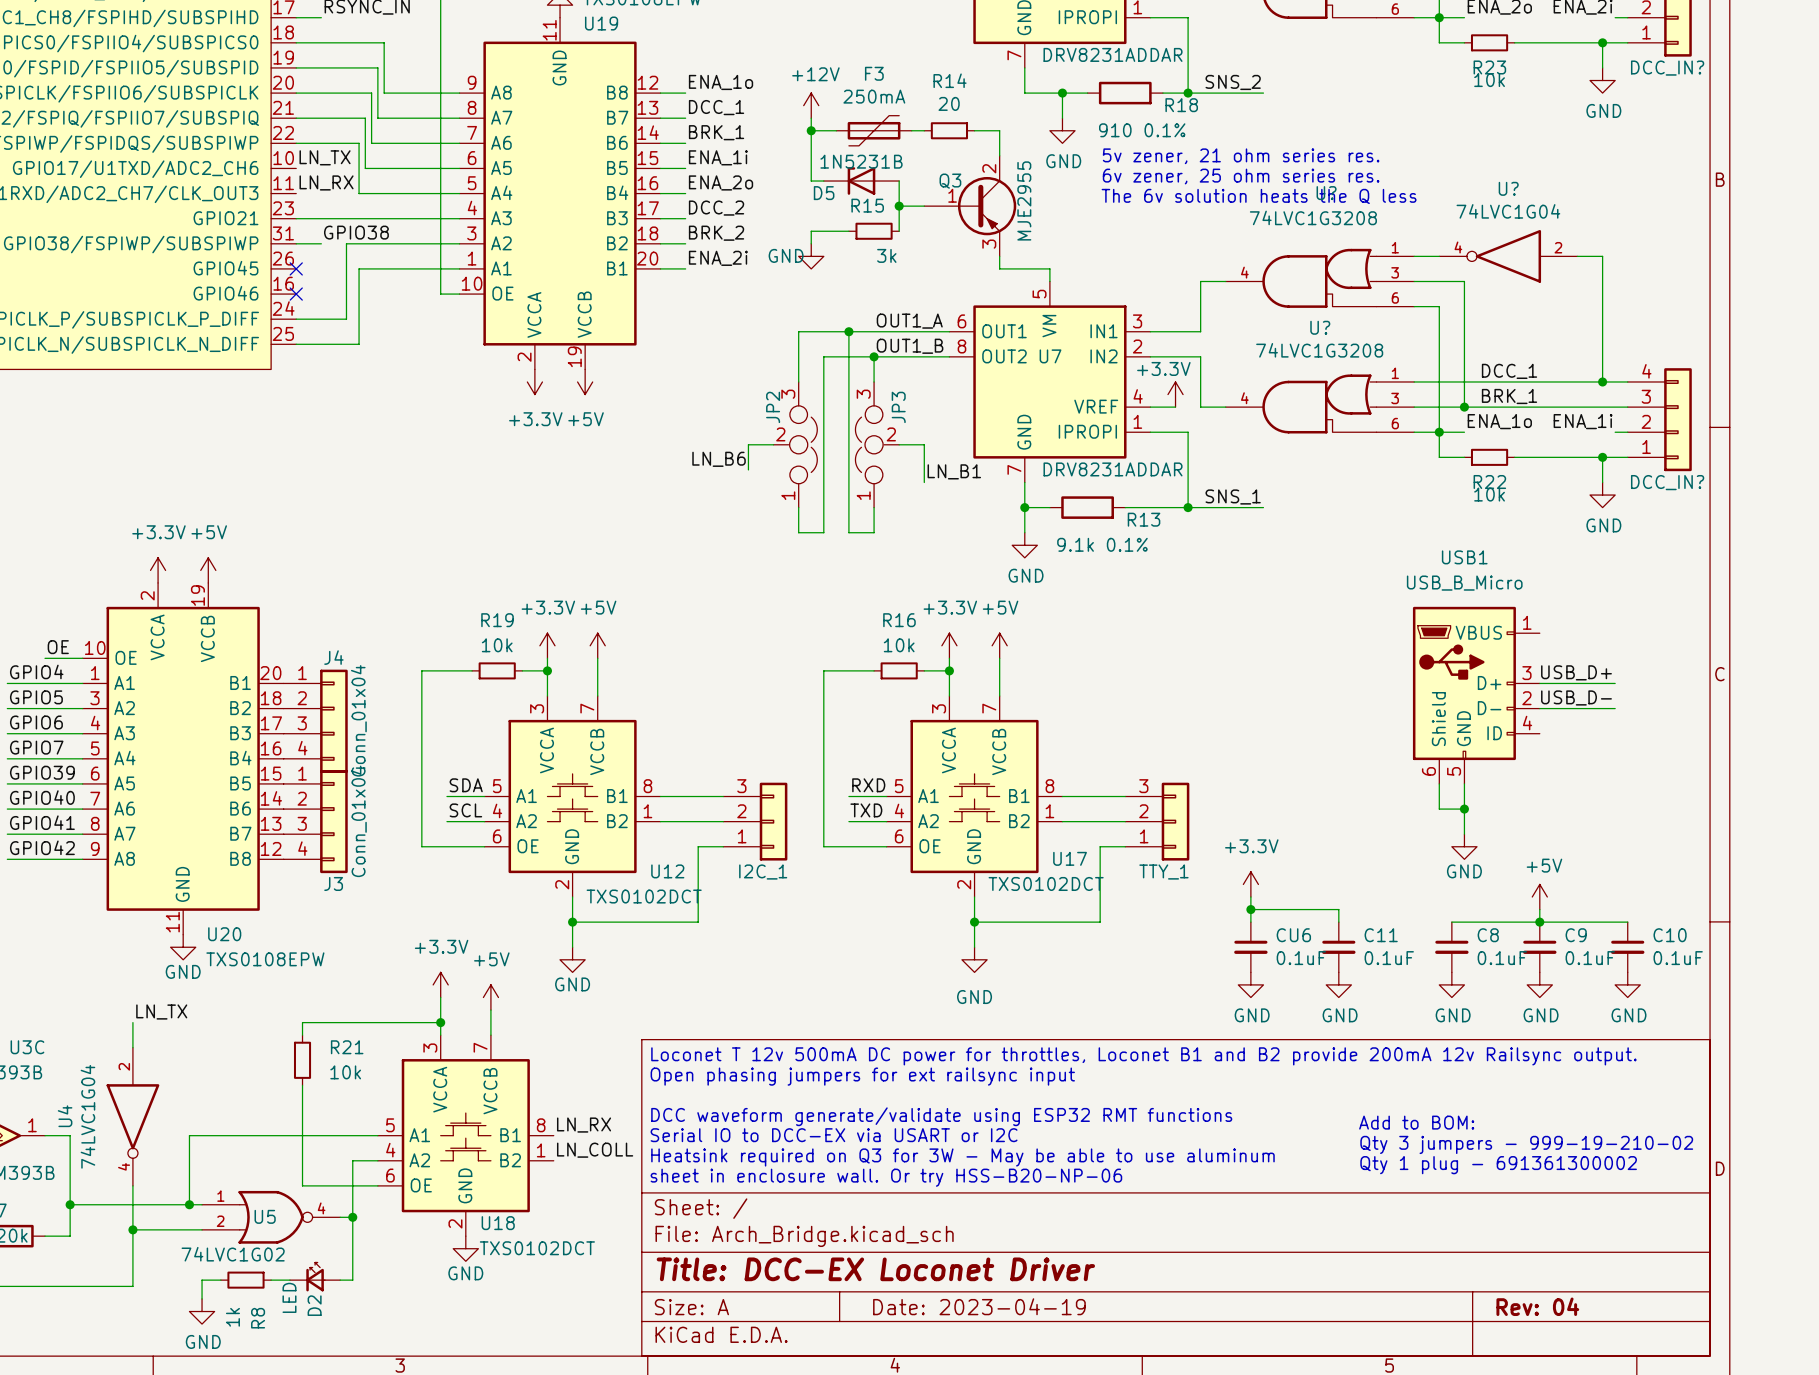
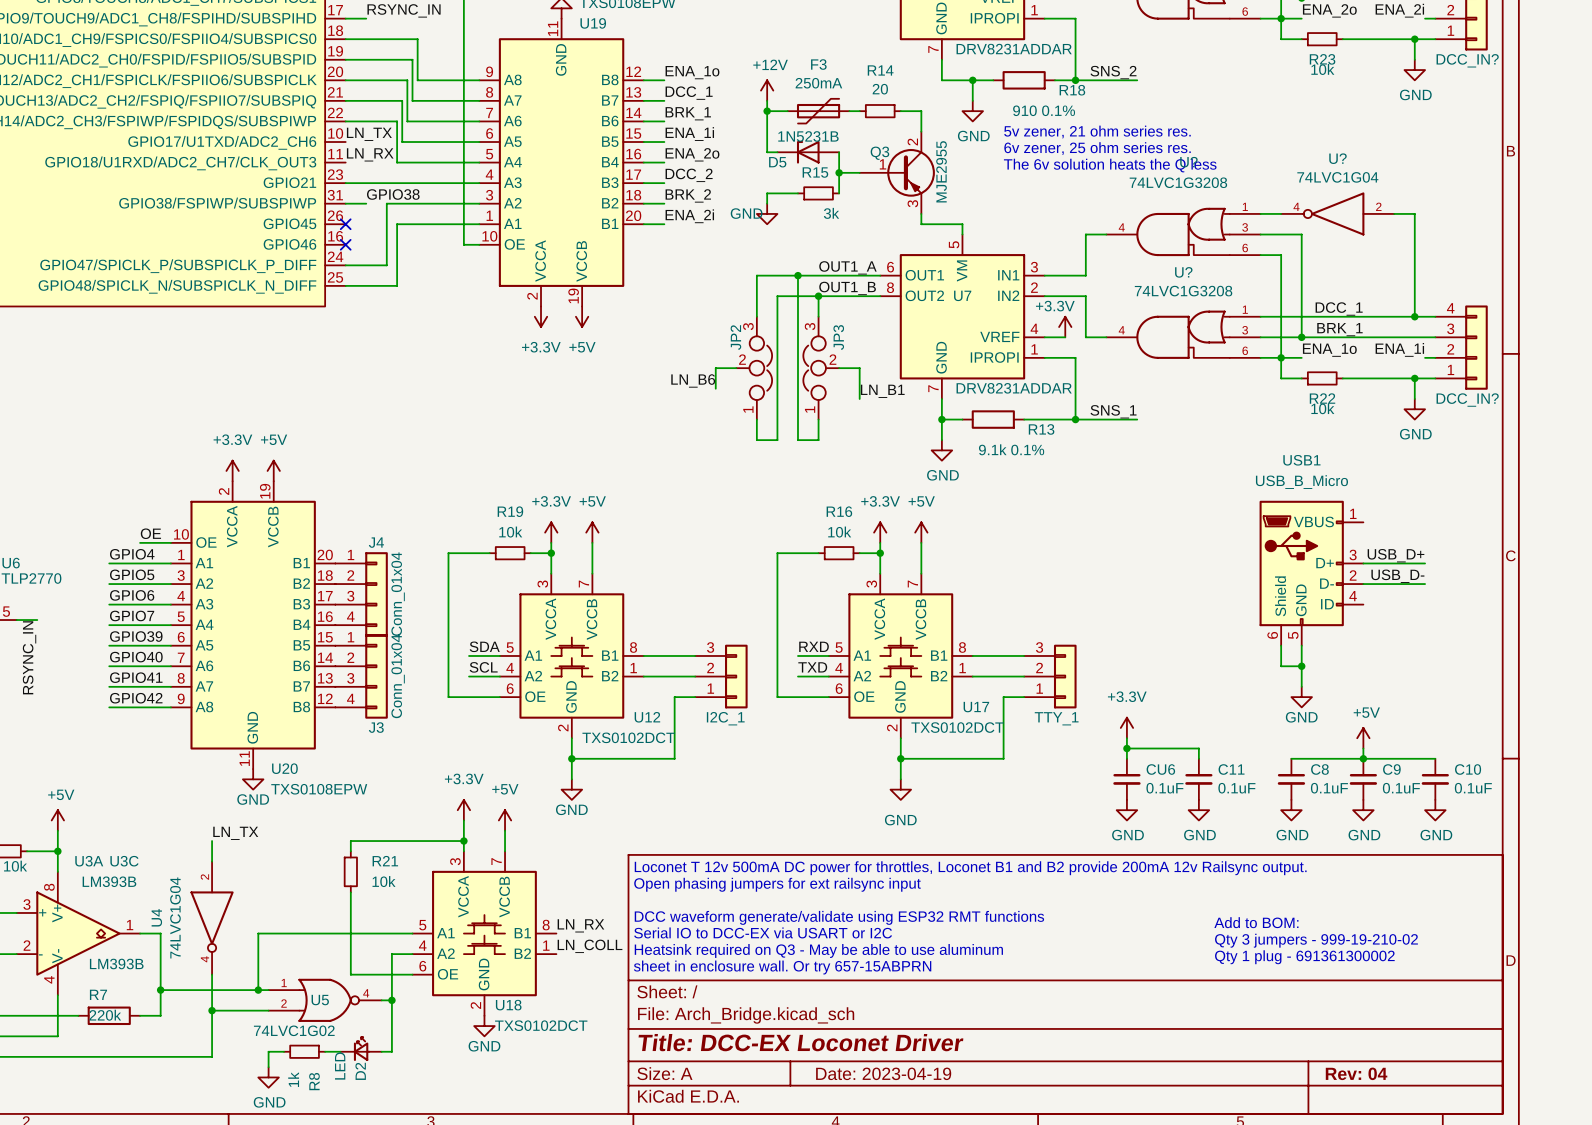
text: Heatsink required on Q3 for 3W - May be able to use aluminum (962, 1157) -> Heatsink required on Q3 - May be able to use aluminum (818, 950)
text: sheet in enclosure wall. Or try HSS-B20-NP-06 (886, 1177) -> sheet in enclosure wall. Or try 657-15ABPRN (782, 967)

